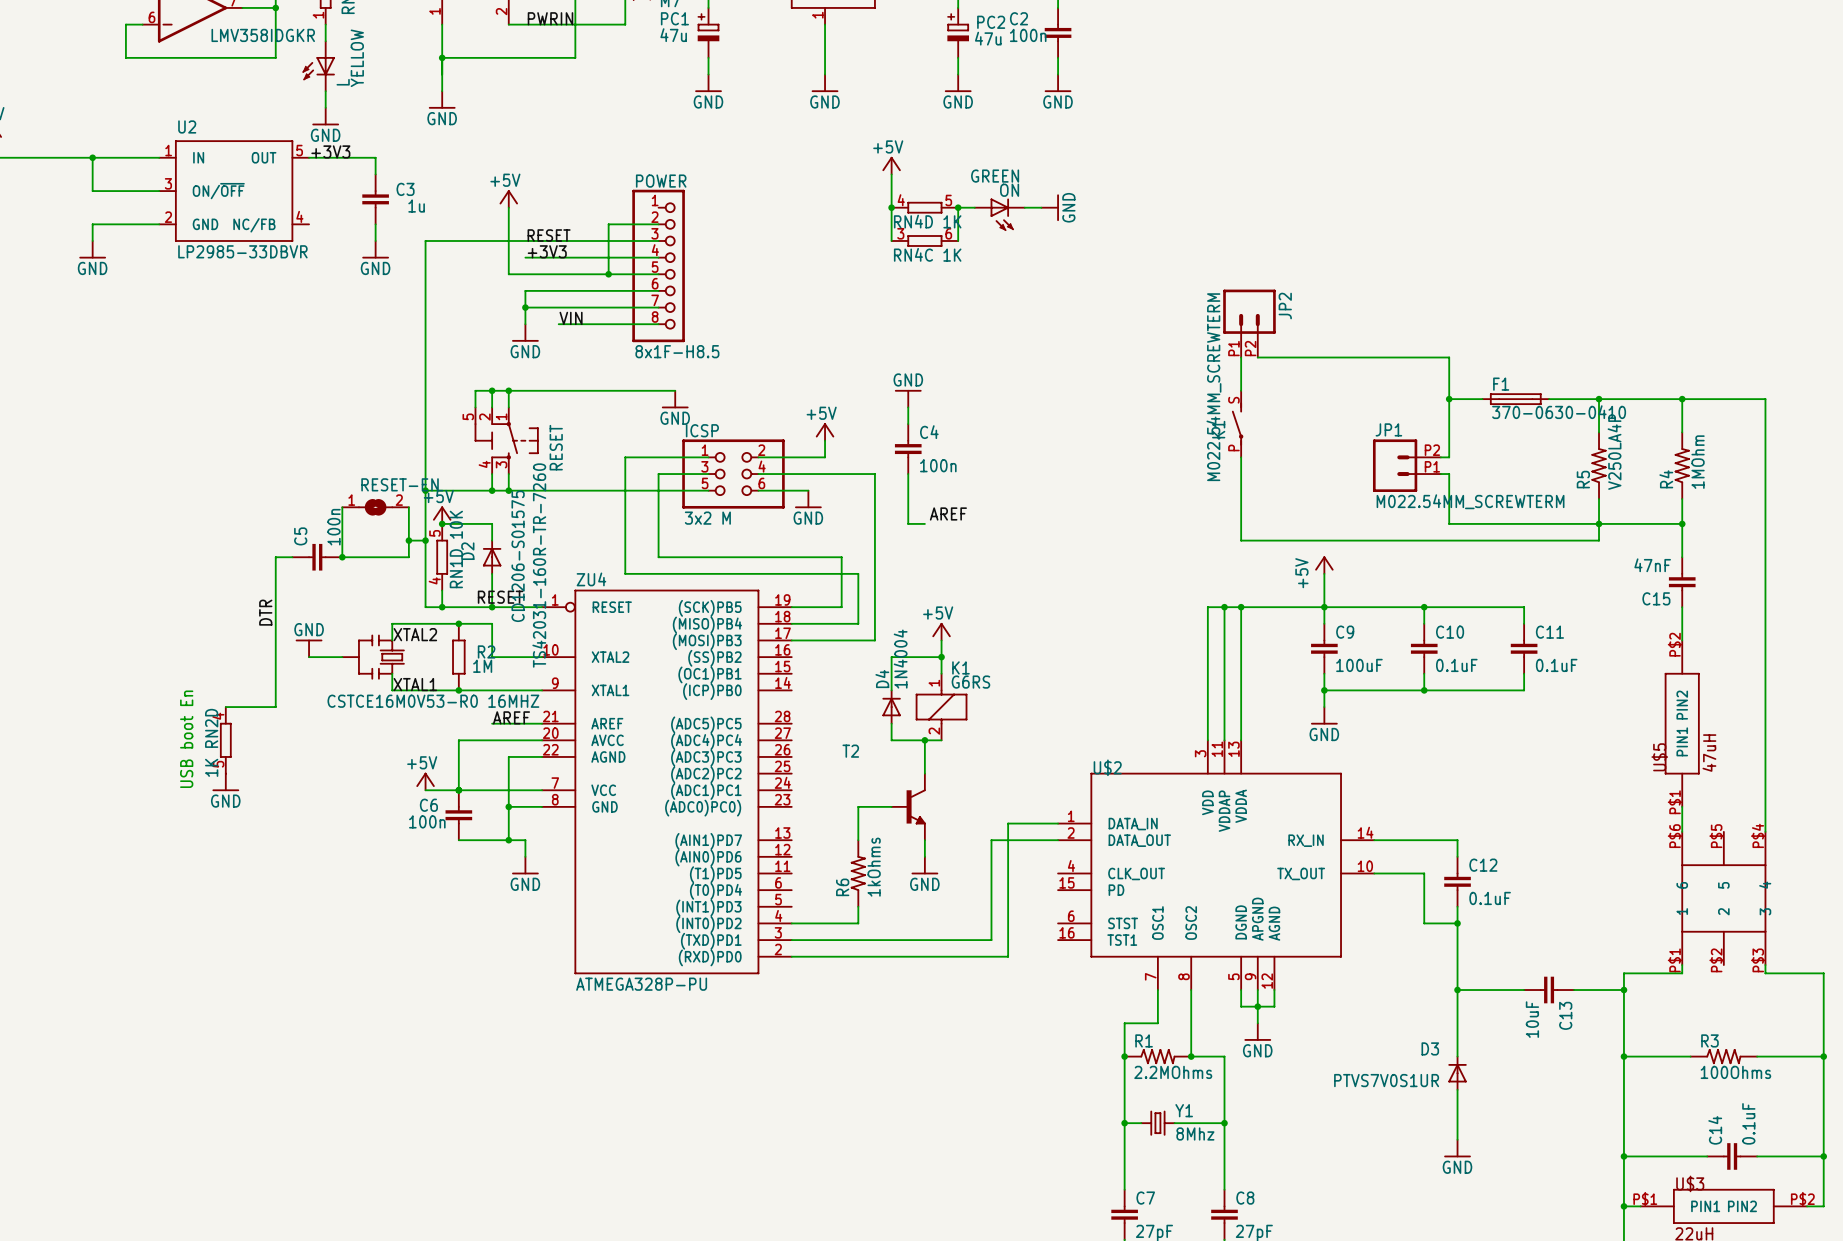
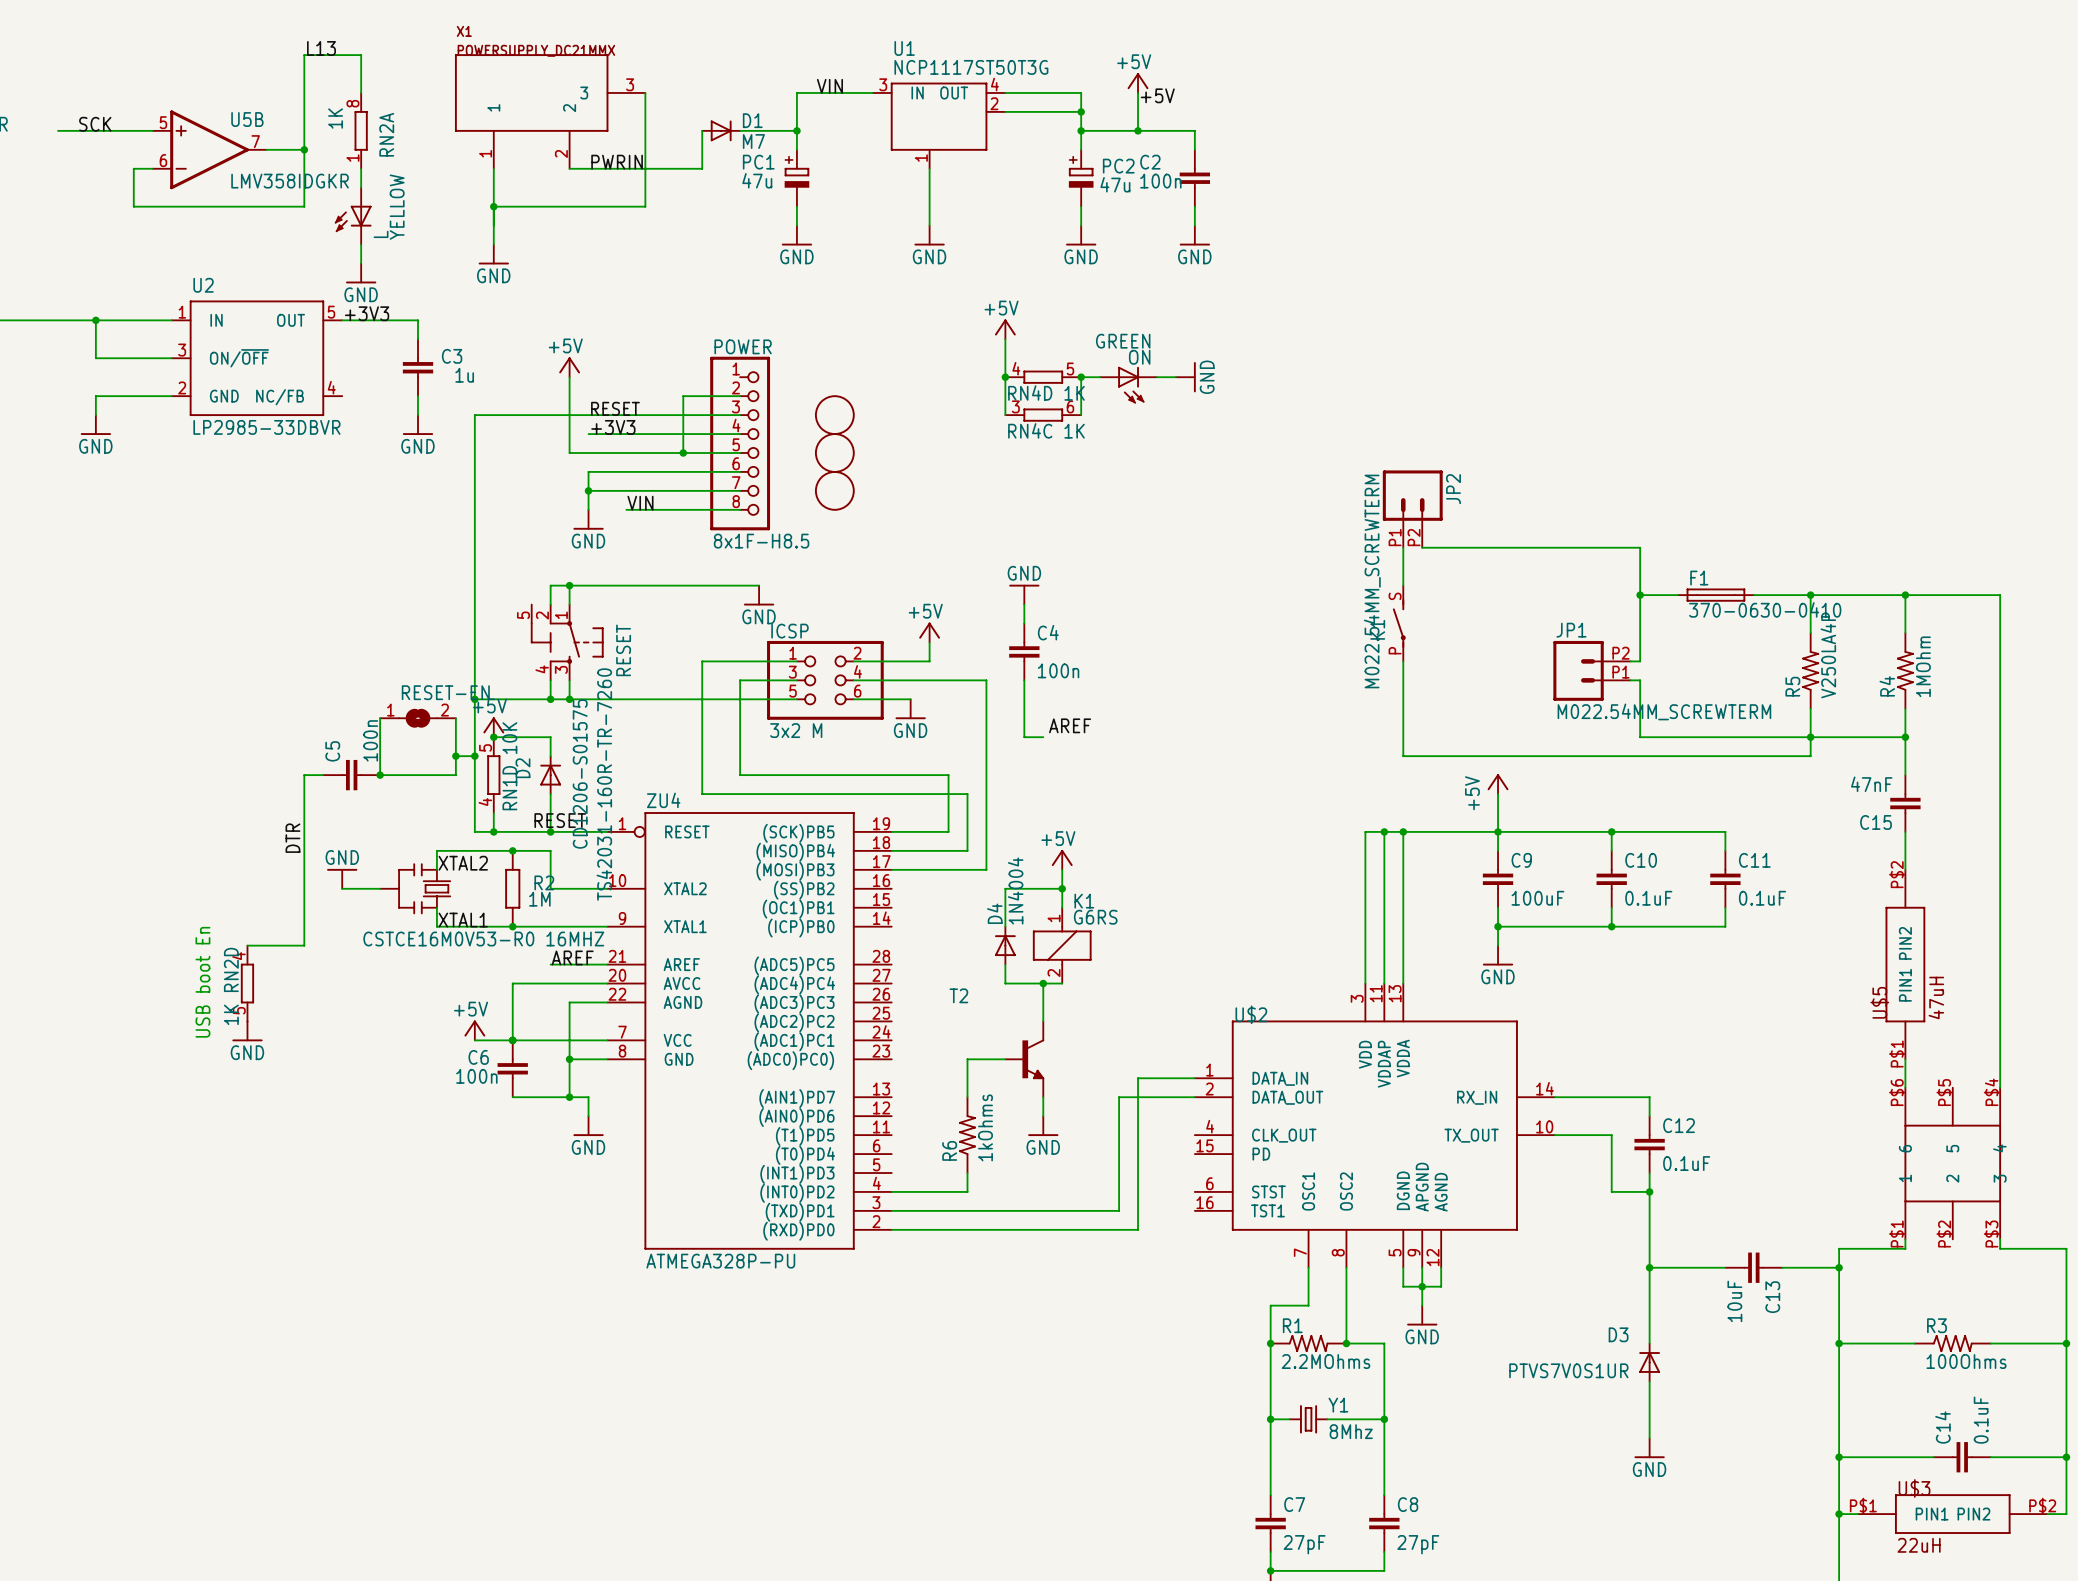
part: none -> (834, 415)
part: none -> (834, 452)
part: none -> (834, 490)
wire: (492, 390) (475, 390) (475, 407) -> none
junction: (492, 390) -> none

